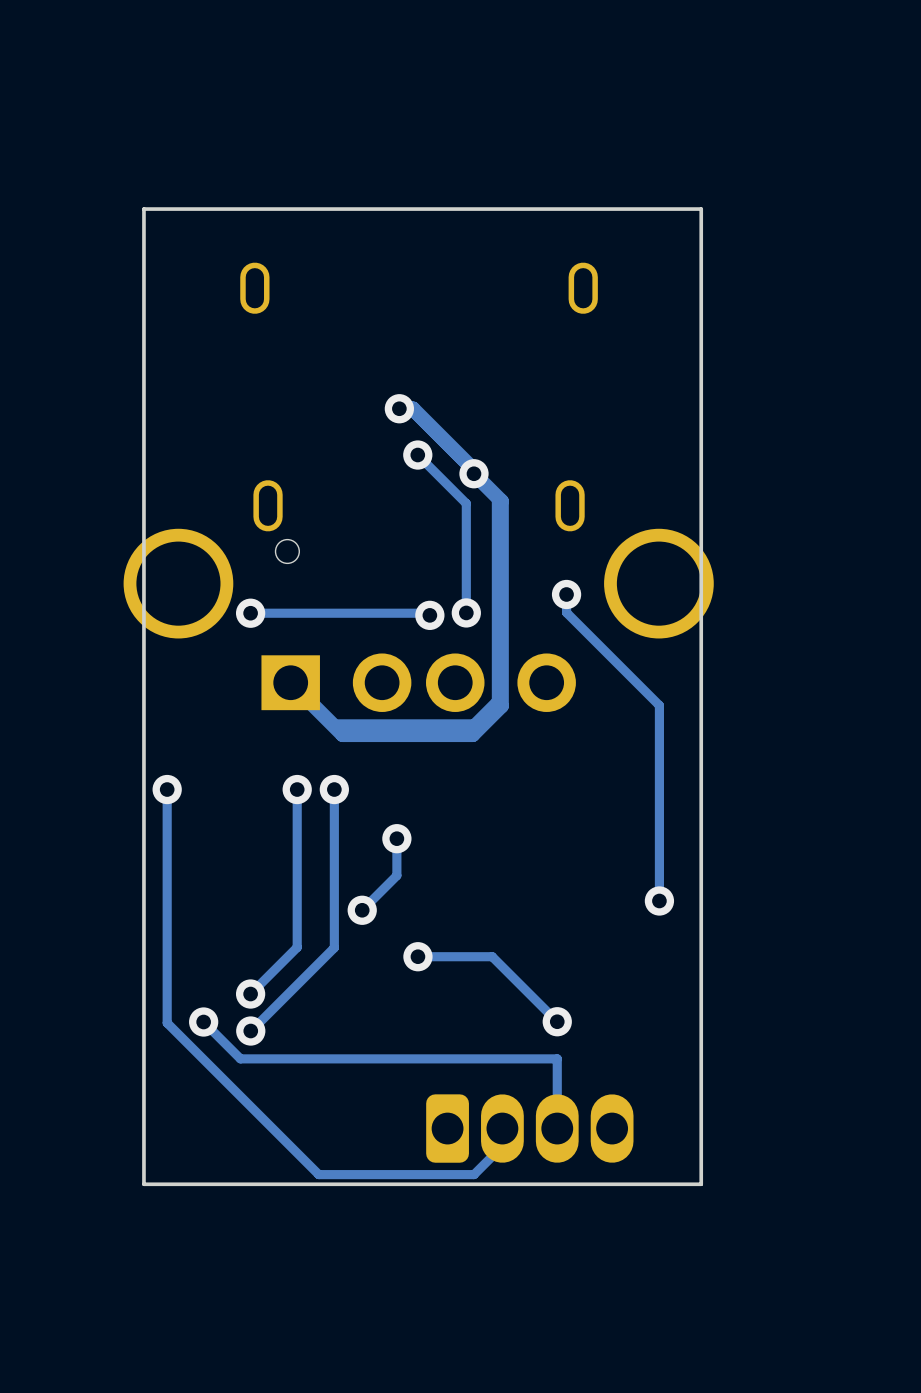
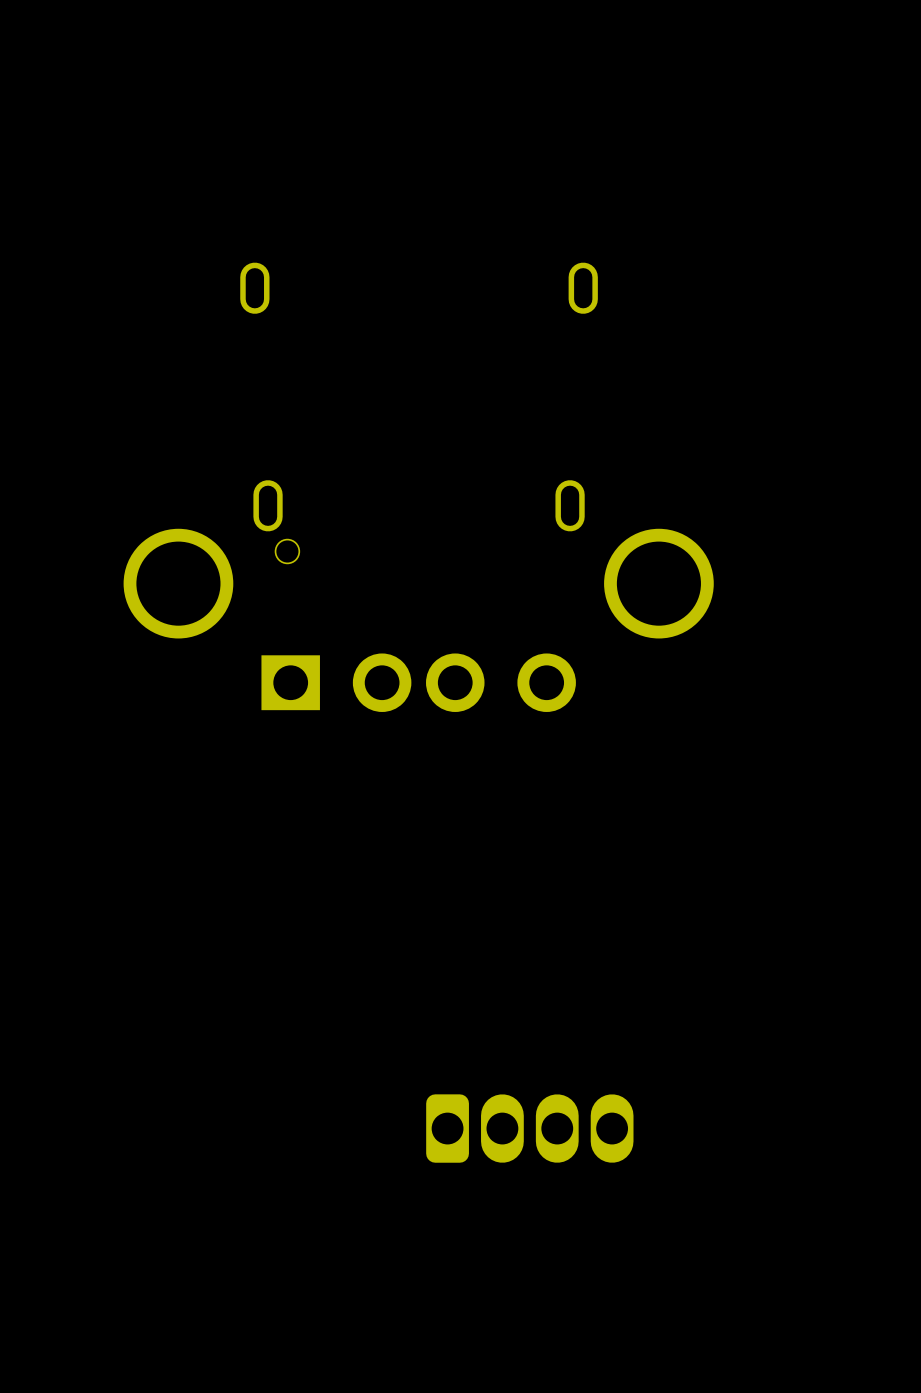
board edge: (701, 209) (143, 209) (143, 1184) (701, 1184) (701, 209) -> none
via: (399, 408) -> none
track: (412, 408) (399, 408) (409, 408) (496, 496) (496, 700) (473, 723) (331, 723) (290, 682) (342, 734) (472, 734) (501, 705) (501, 501) (473, 473) (473, 469) (412, 408) -> none
track: (417, 455) (466, 503) (466, 612) -> none
via: (417, 455) -> none
via: (473, 473) -> none
track: (566, 594) (566, 612) (659, 705) (659, 900) -> none
via: (566, 594) -> none
via: (466, 612) -> none
track: (250, 613) (427, 613) (429, 615) -> none
via: (250, 613) -> none
via: (429, 615) -> none
track: (167, 789) (167, 1023) (318, 1174) (474, 1174) (502, 1146) (502, 1128) -> none
via: (167, 789) -> none
track: (297, 789) (297, 947) (250, 994) -> none
via: (297, 789) -> none
track: (334, 789) (334, 947) (251, 1031) -> none
via: (334, 789) -> none
track: (396, 838) (396, 875) (362, 910) -> none
via: (396, 838) -> none
via: (659, 900) -> none
via: (362, 910) -> none
track: (417, 956) (492, 956) (557, 1021) -> none
via: (417, 956) -> none
via: (250, 994) -> none
via: (557, 1021) -> none
track: (203, 1022) (240, 1058) (557, 1058) (557, 1128) -> none
via: (203, 1022) -> none
via: (250, 1031) -> none

